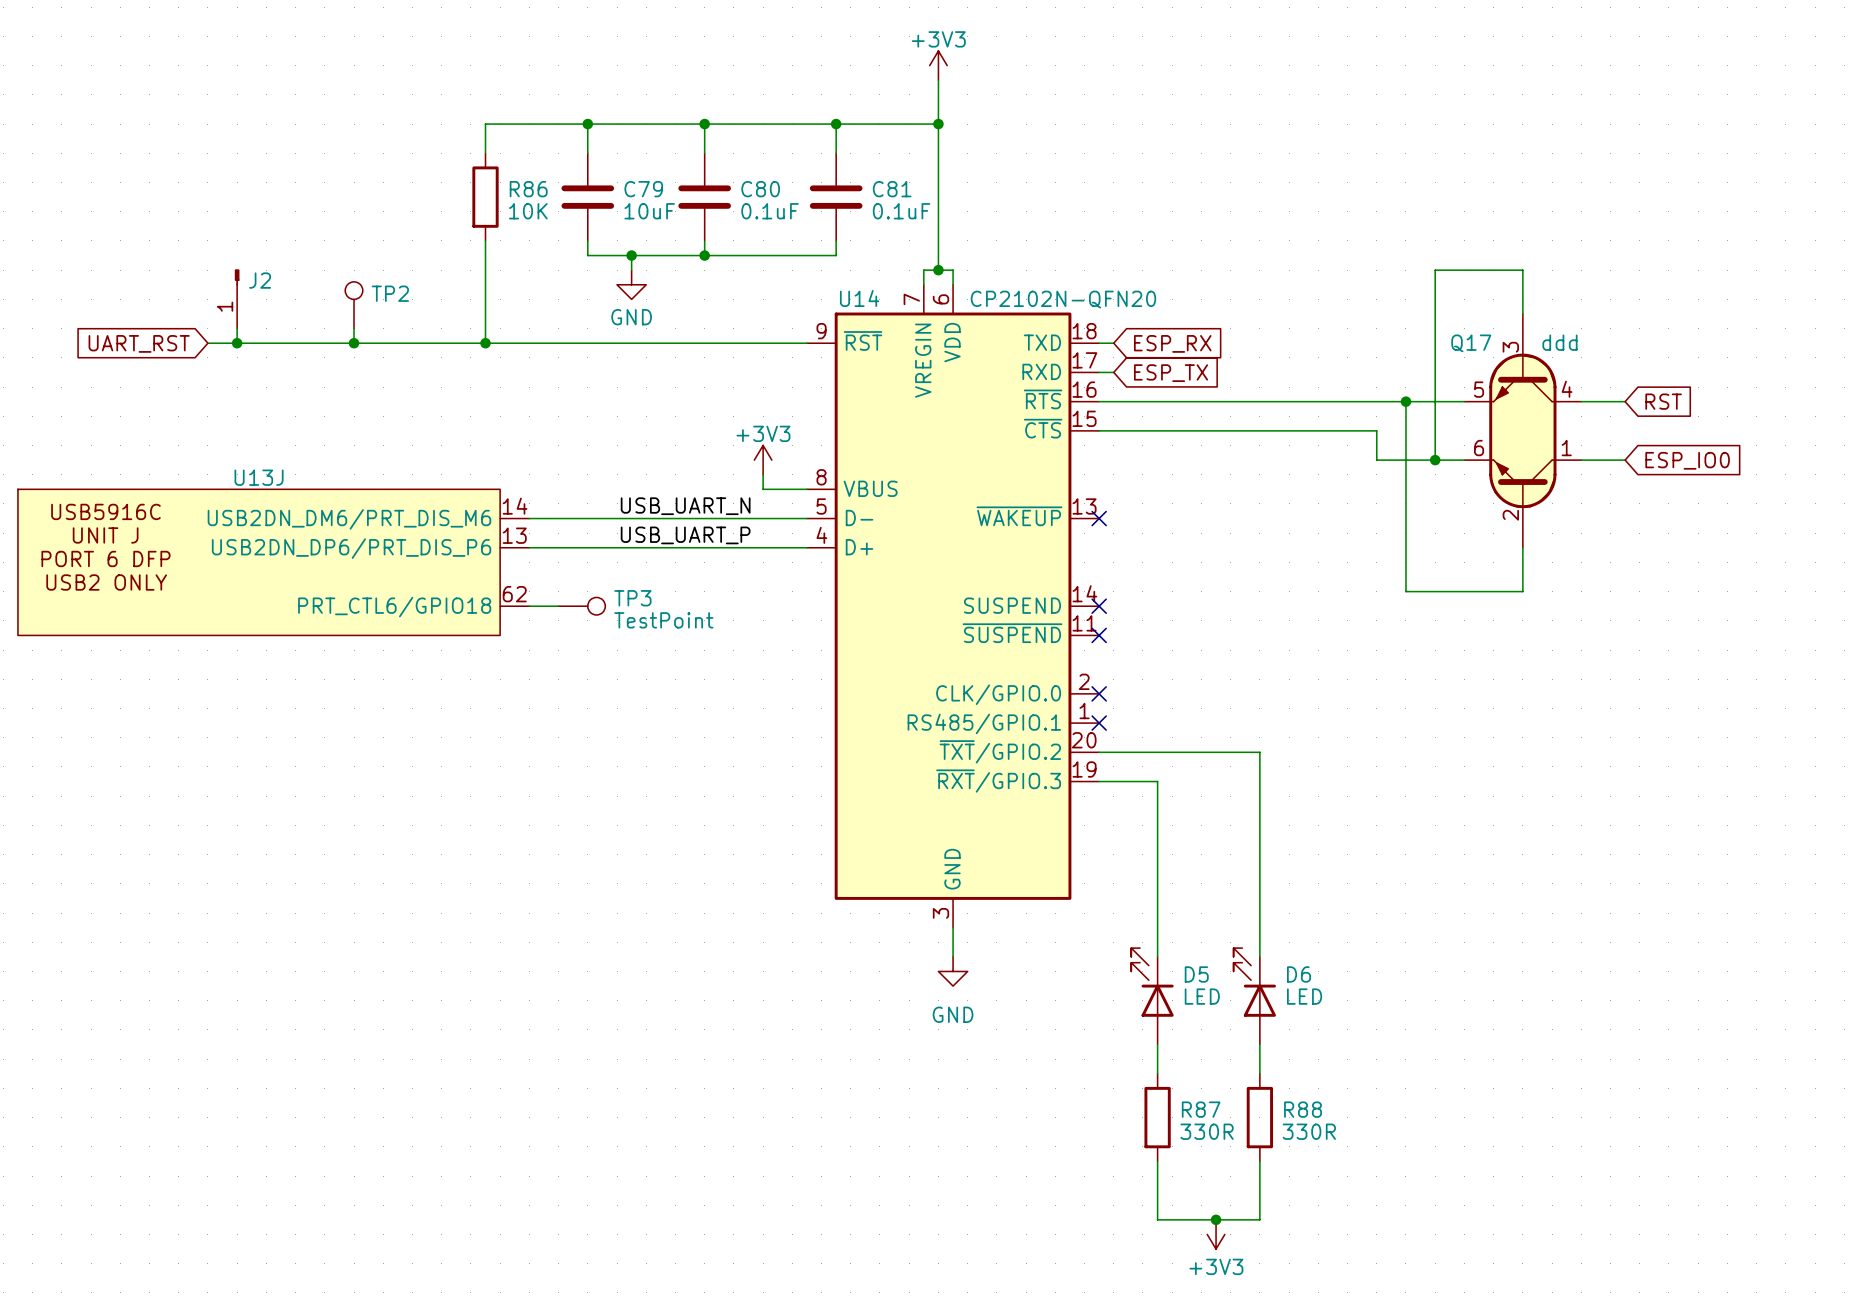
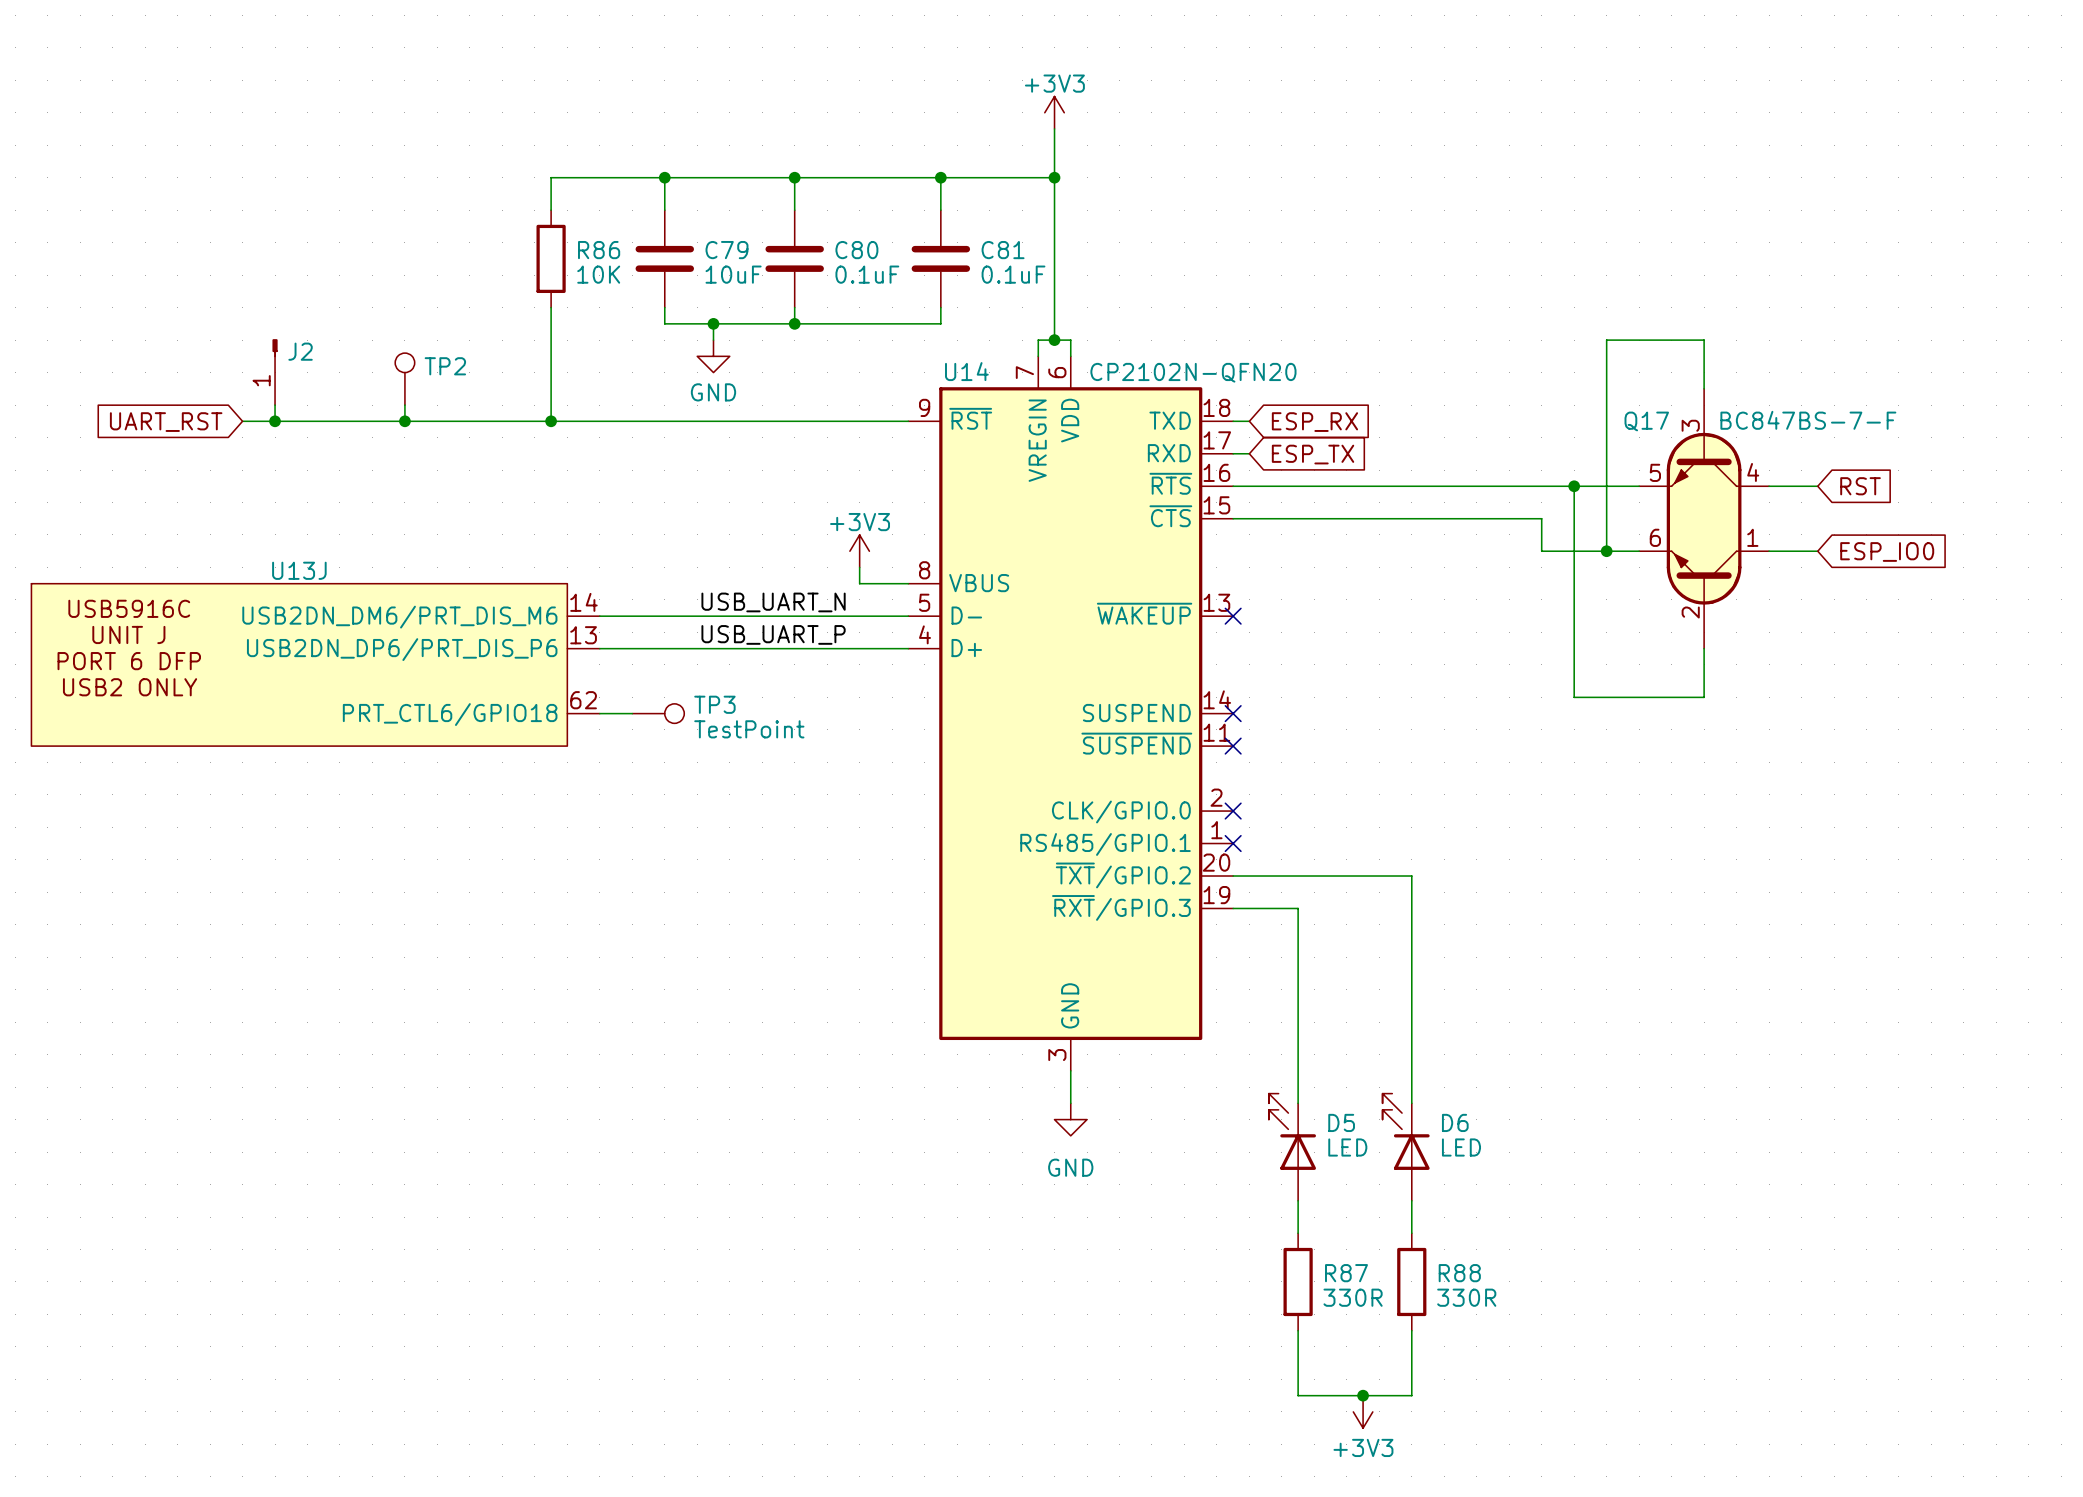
Q17 value: ddd (1559, 342) -> BC847BS-7-F (1808, 420)

